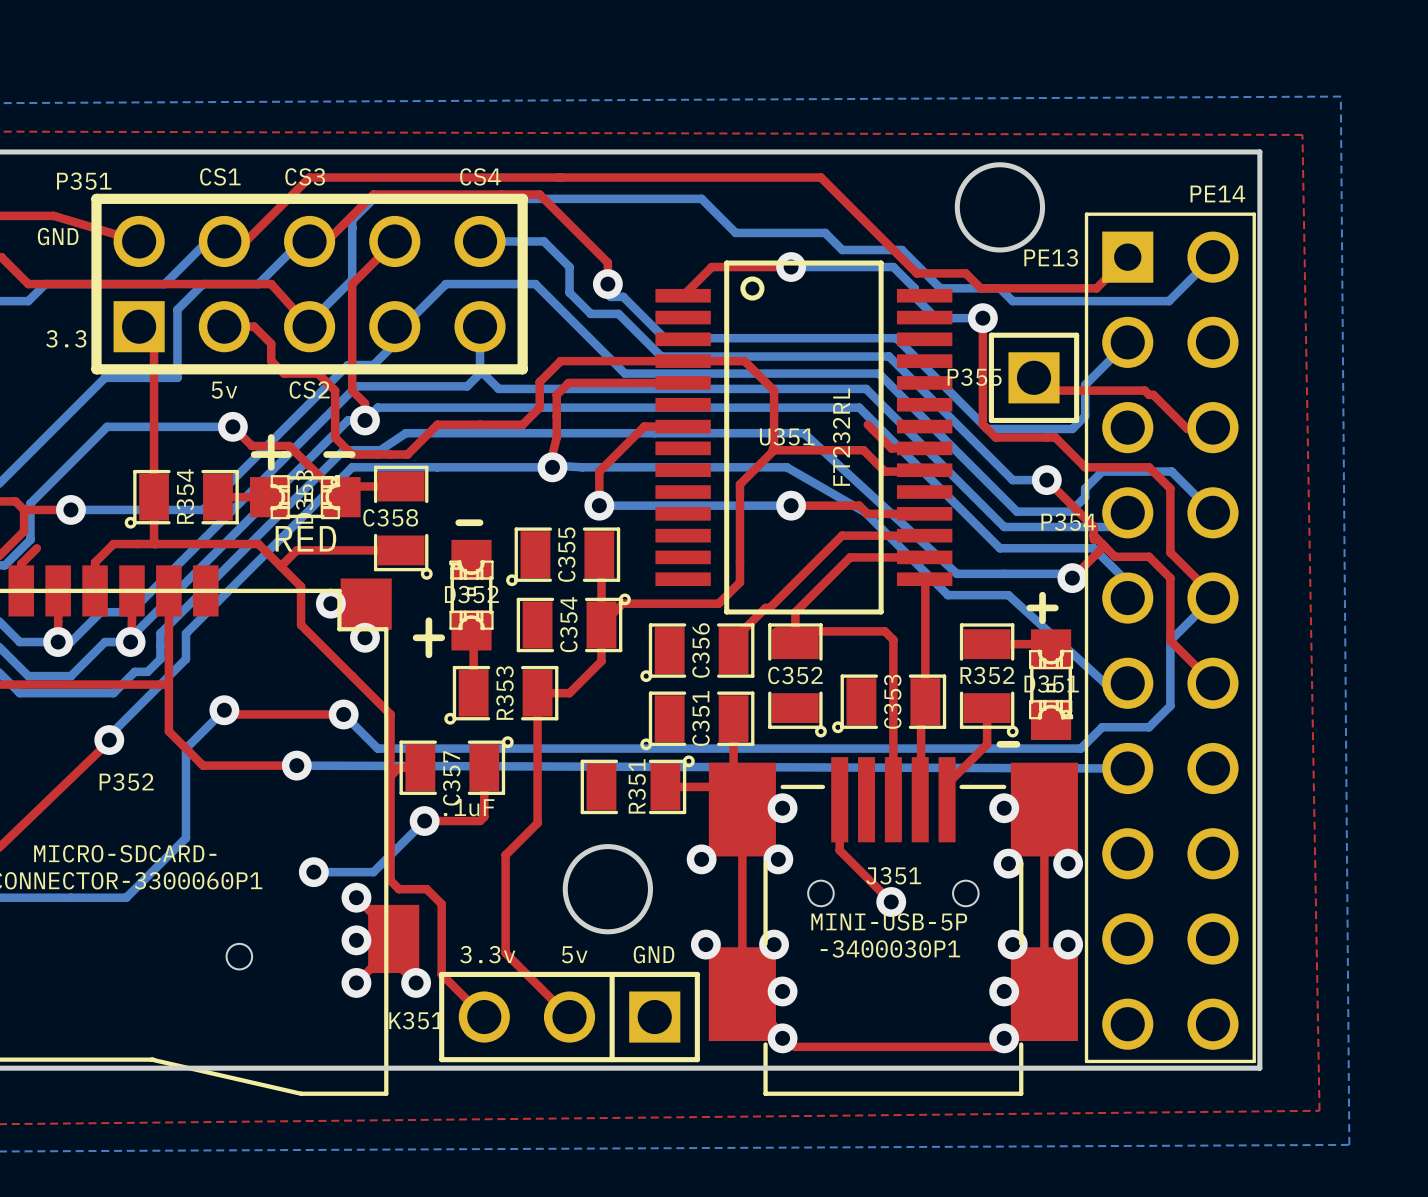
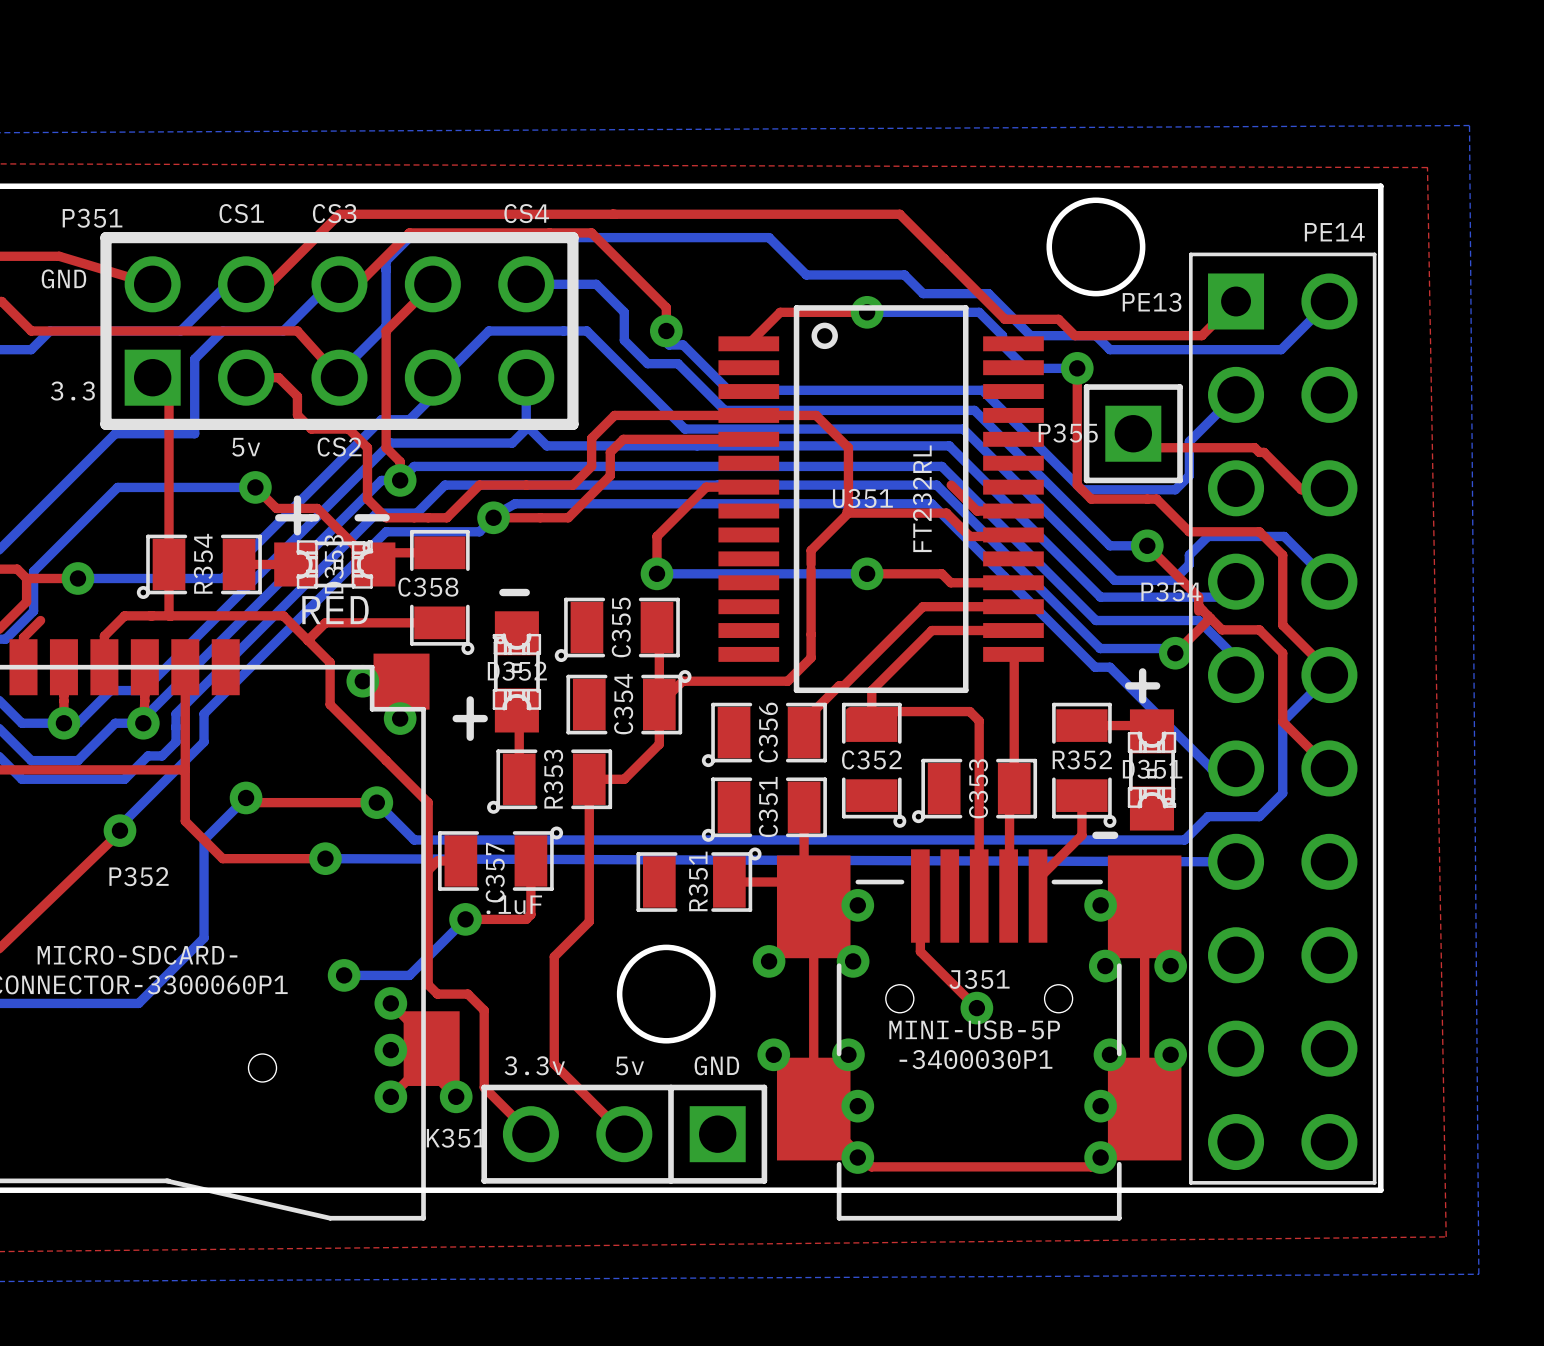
top track: (556, 416) (556, 437) (552, 454) (552, 467) -> (610, 475) (568, 517) (493, 517)
bottom track: (380, 450) (405, 433) (803, 433) (956, 573) (1003, 573) -> (416, 513) (444, 485) (936, 485) (1100, 648)
bottom track: (437, 467) (552, 467) (552, 465) (786, 467) (865, 512) (948, 595) (1008, 595) (1105, 683) -> (479, 531) (493, 515) (515, 503) (931, 503) (1095, 667) (1109, 667) (1211, 768)
via position: (552, 467) -> (493, 517)

